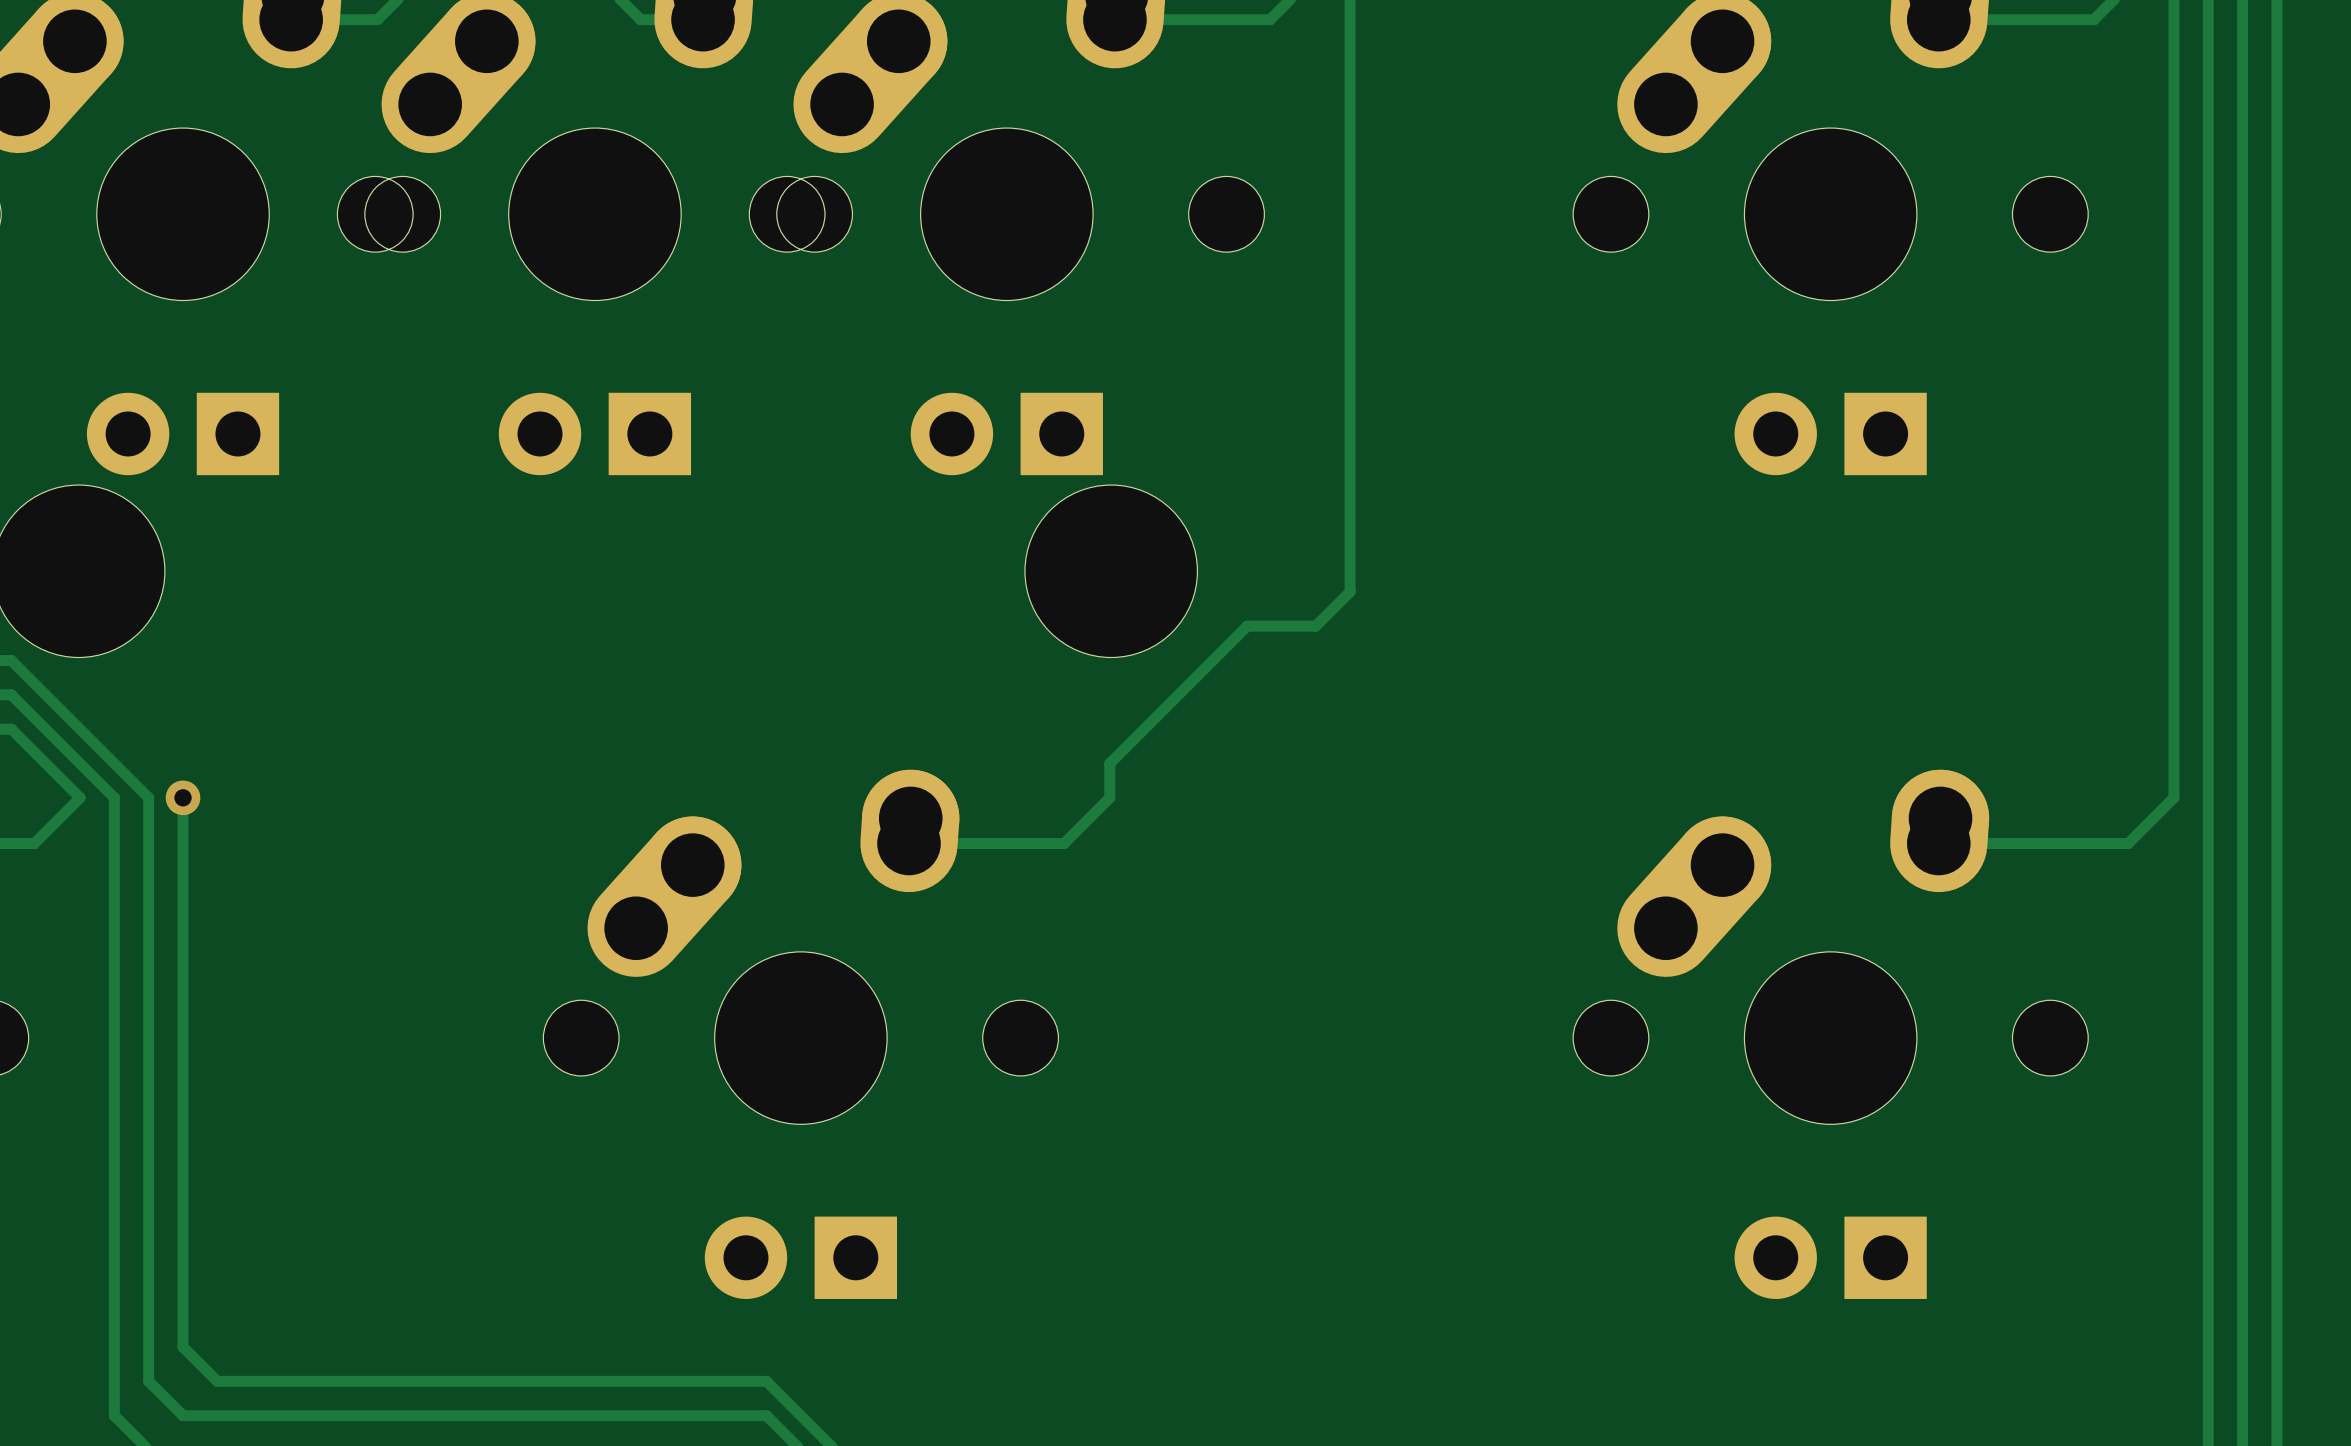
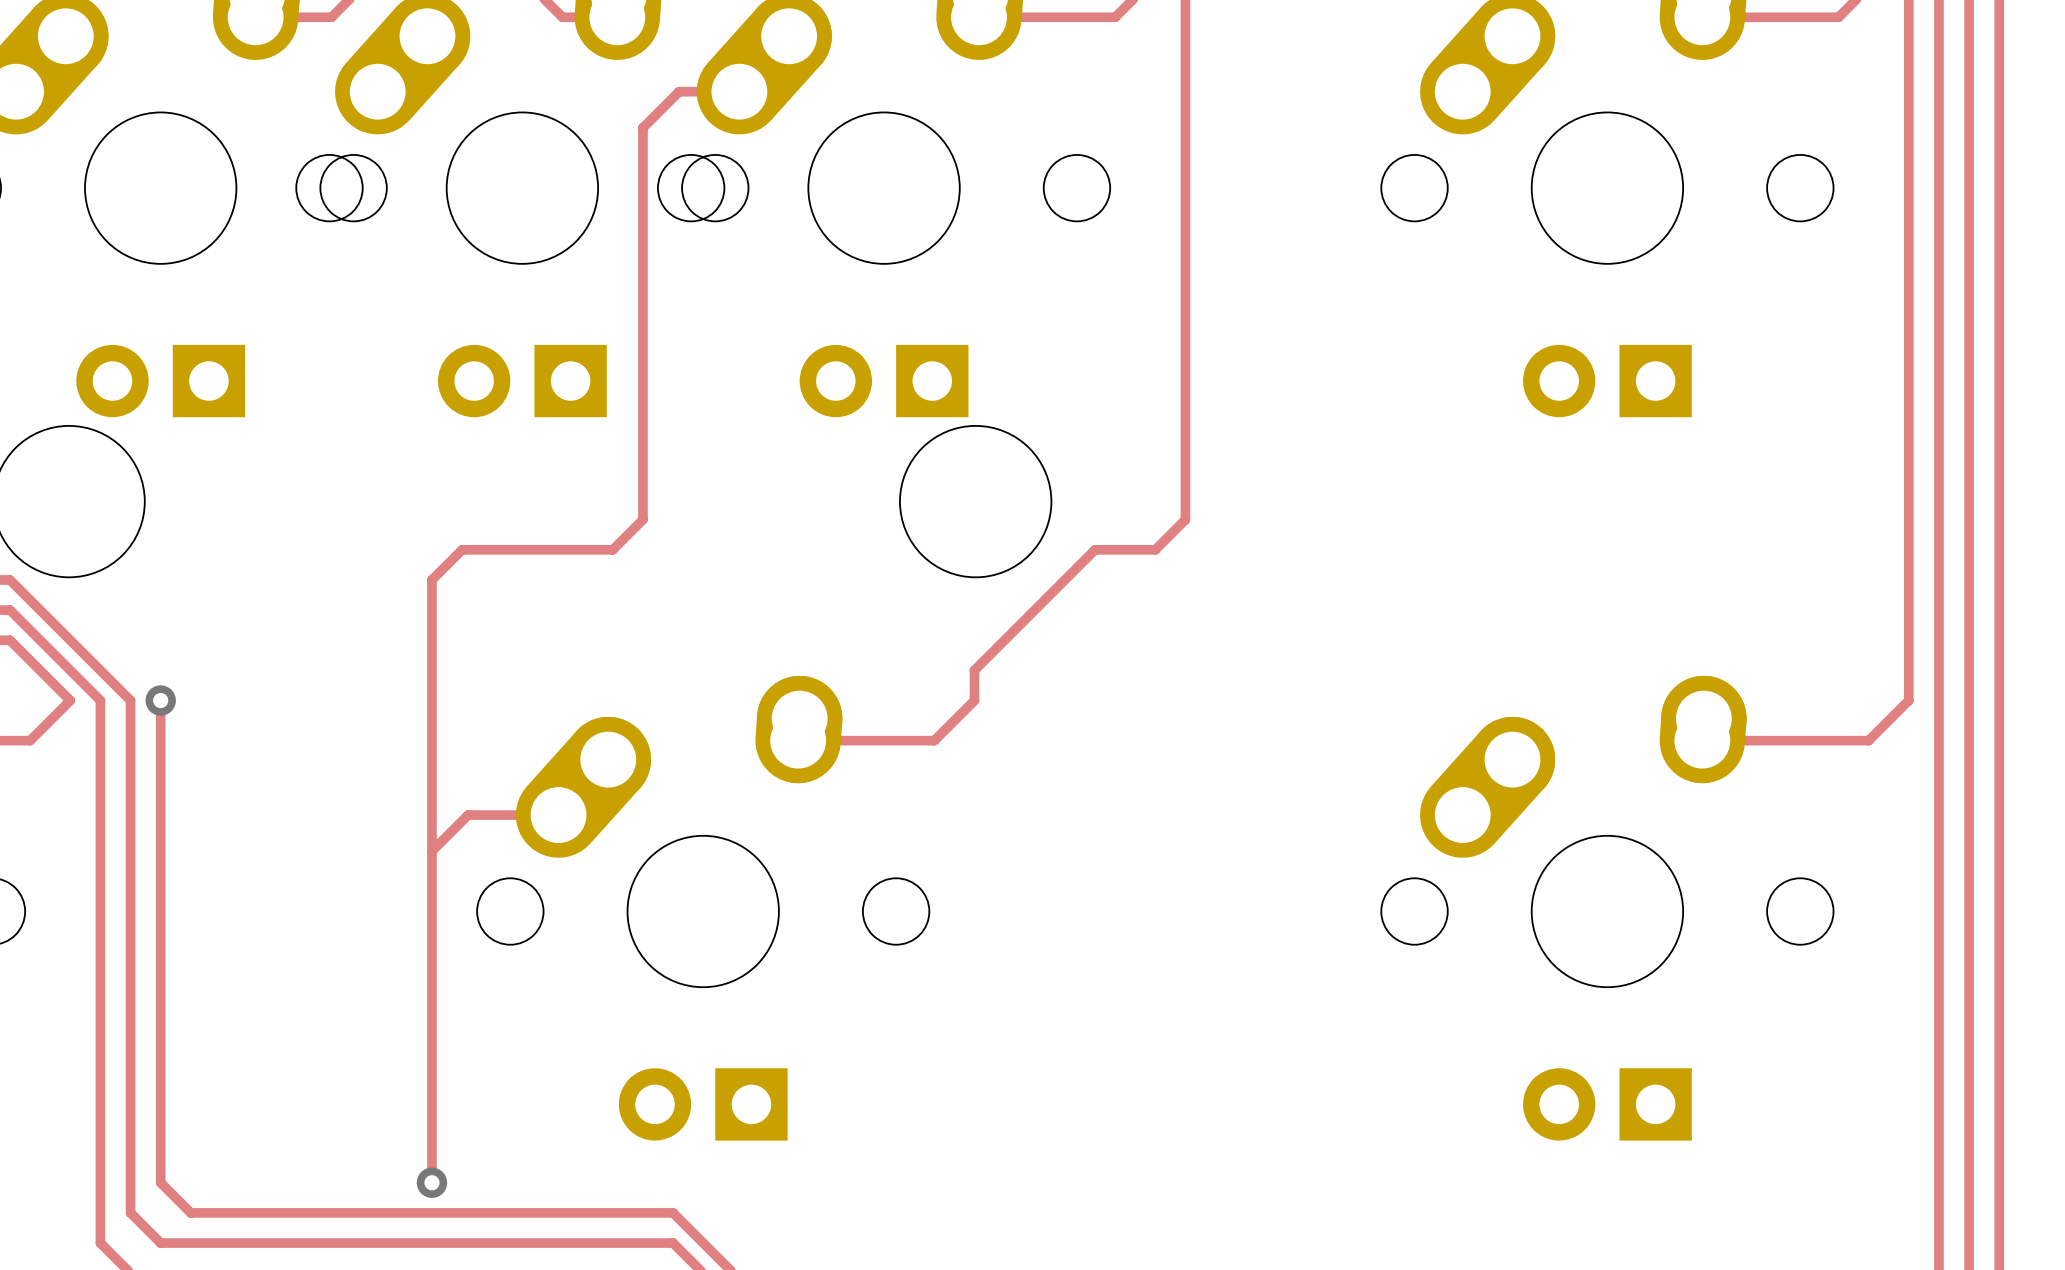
track: none -> (739, 91) (679, 91) (642, 127) (642, 519) (612, 549) (462, 549) (431, 579) (431, 1182)
track: none -> (558, 815) (468, 815) (431, 851)
via: none -> (431, 1182)

